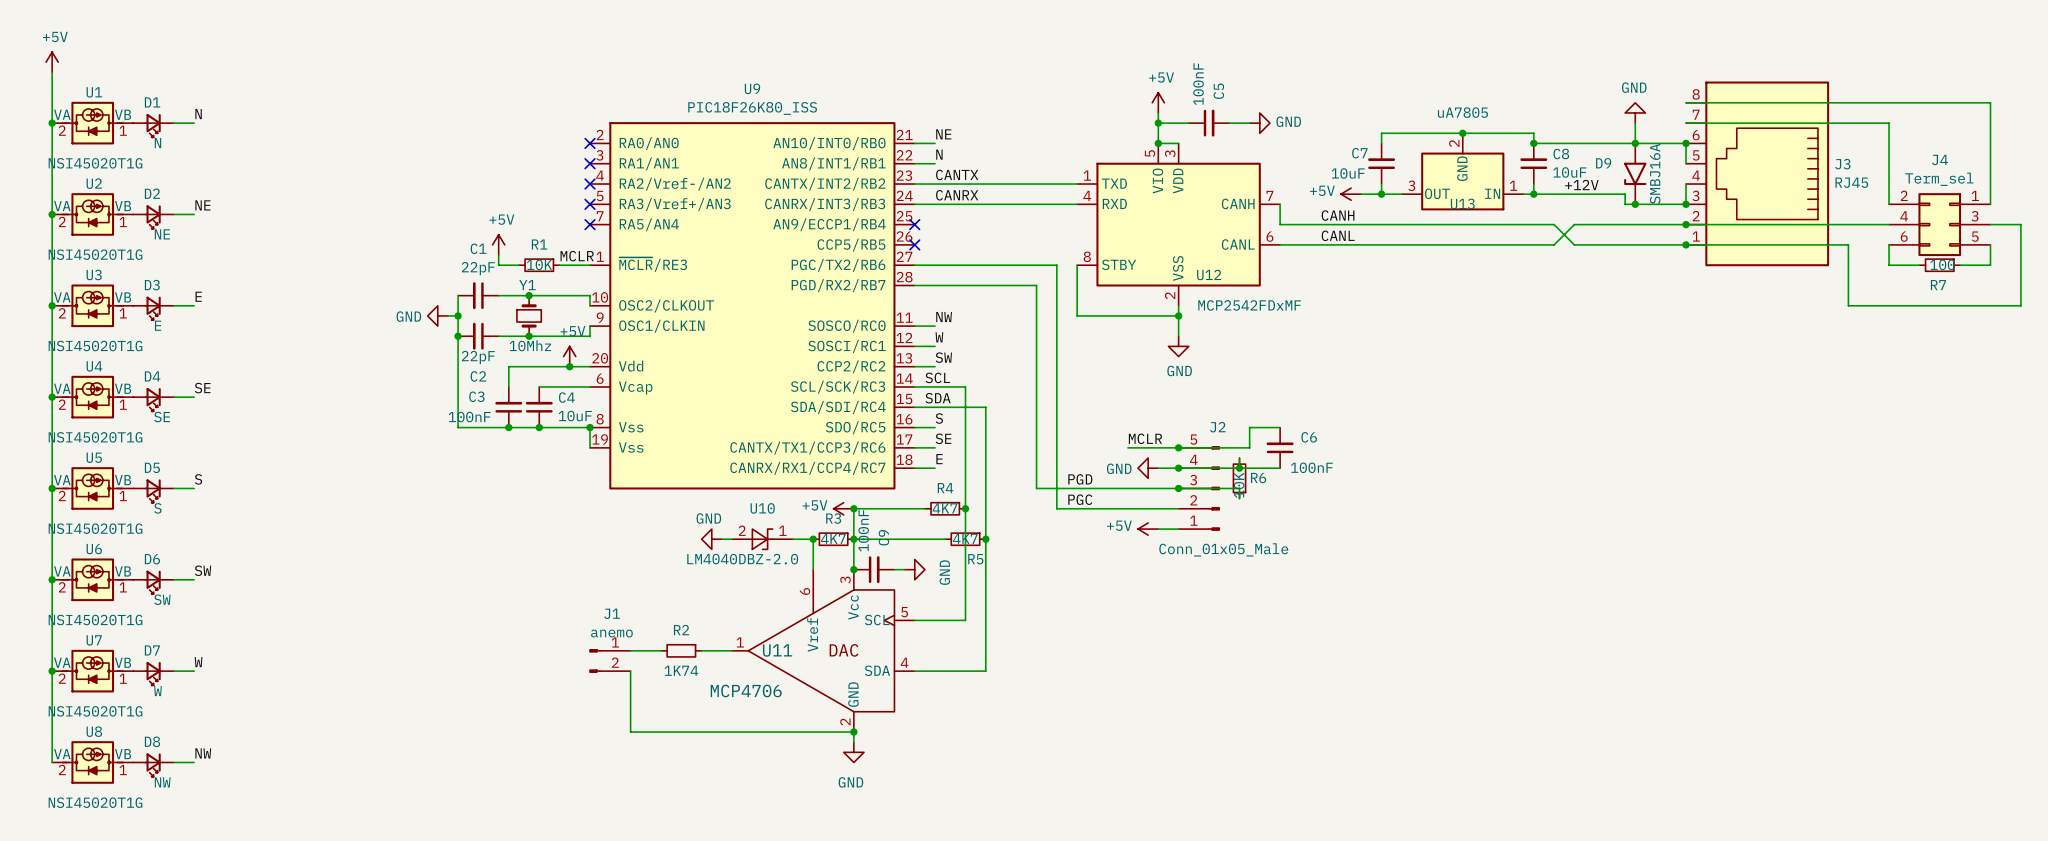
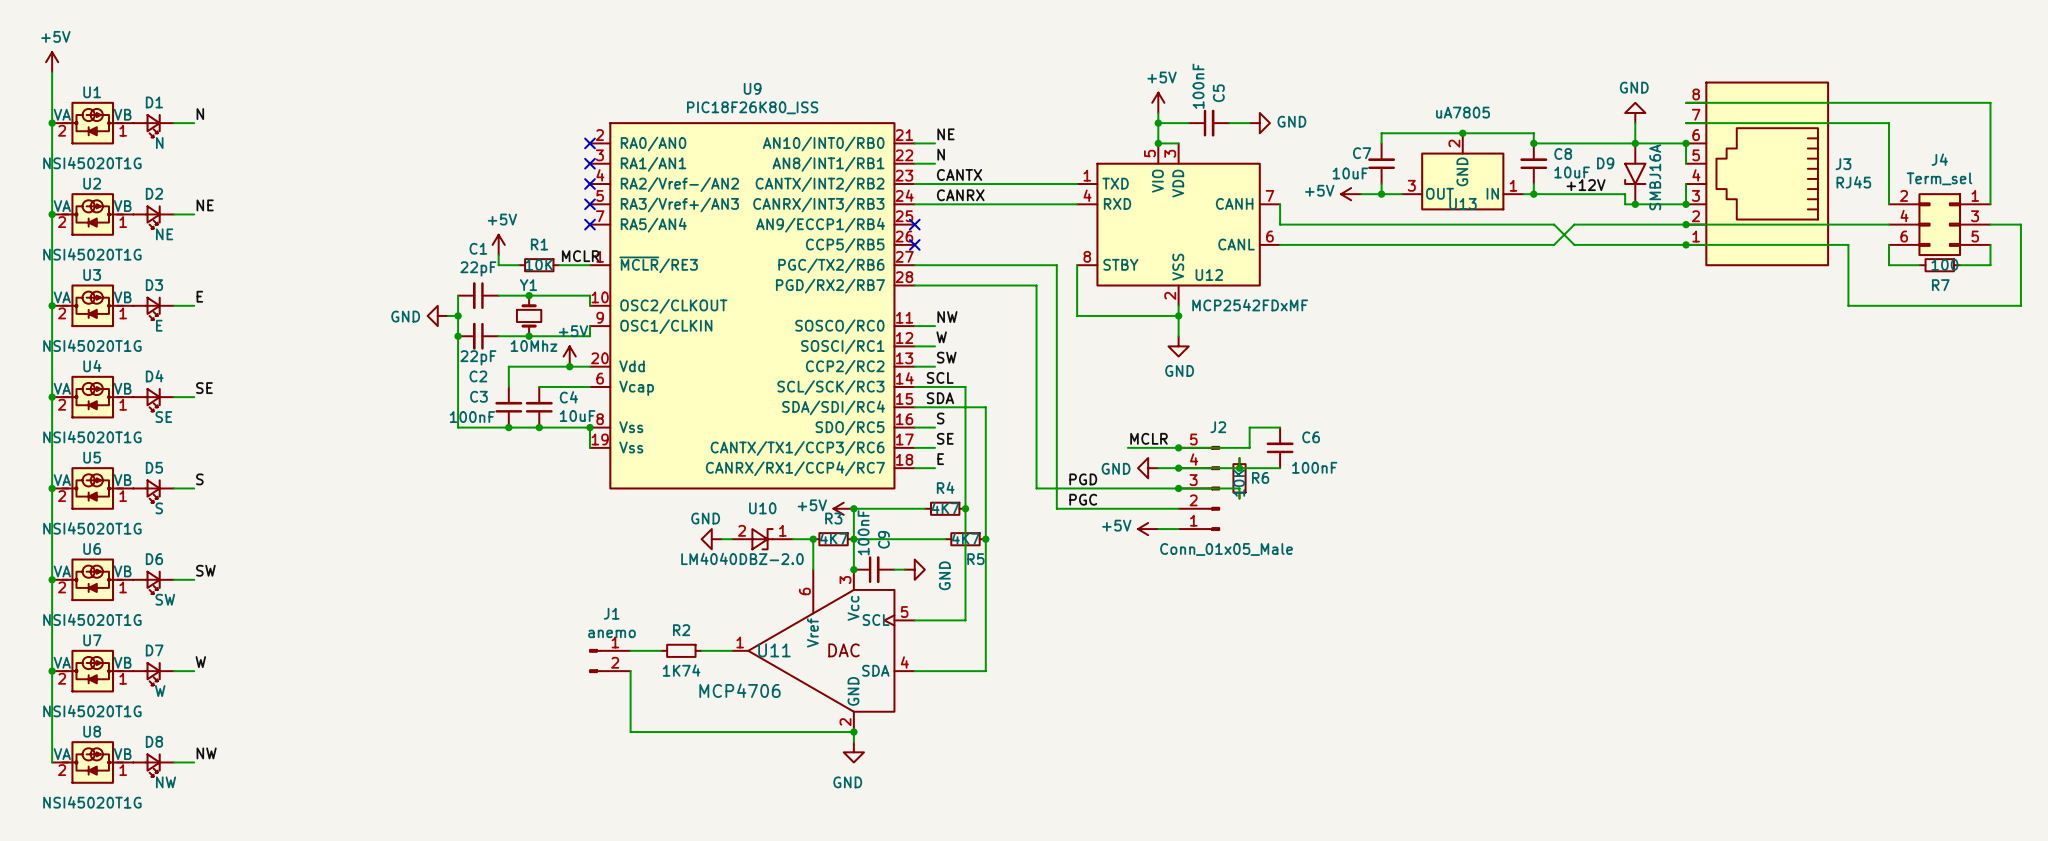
label: CANH (1338, 215) -> none
label: CANL (1338, 235) -> none

